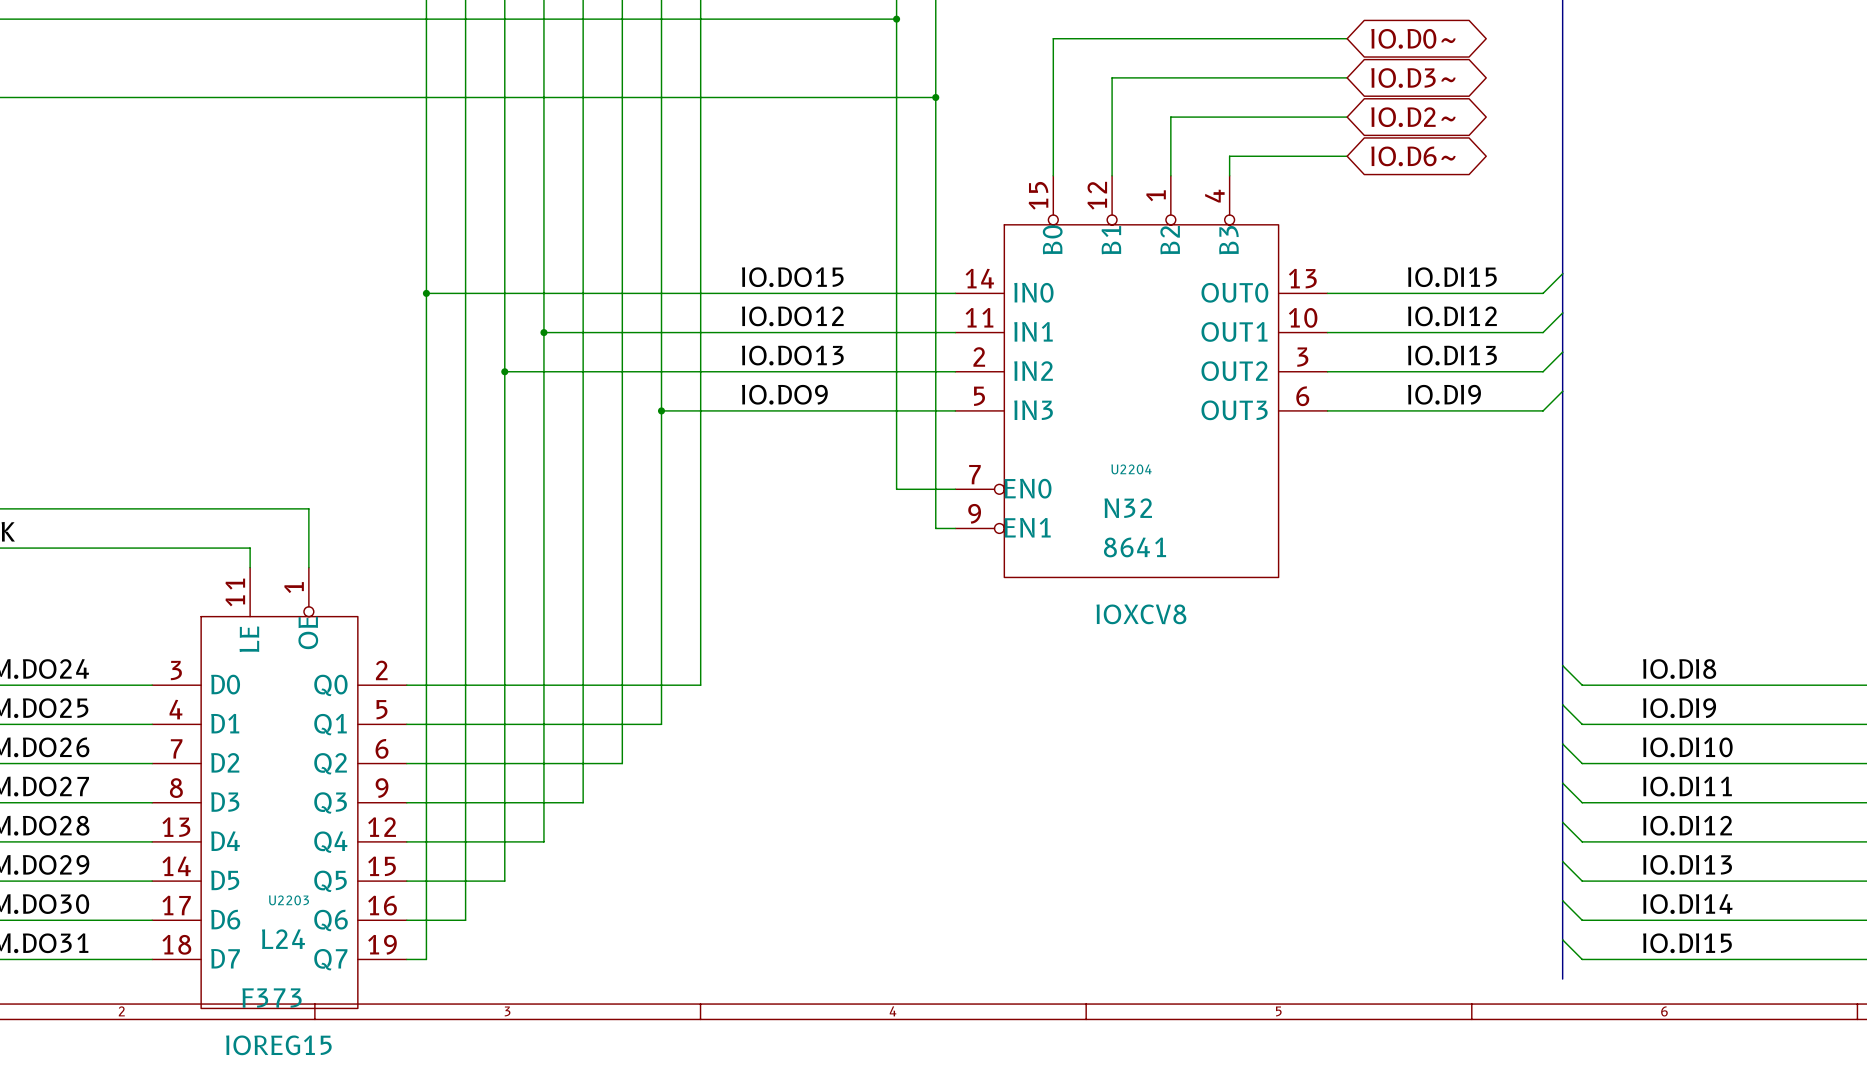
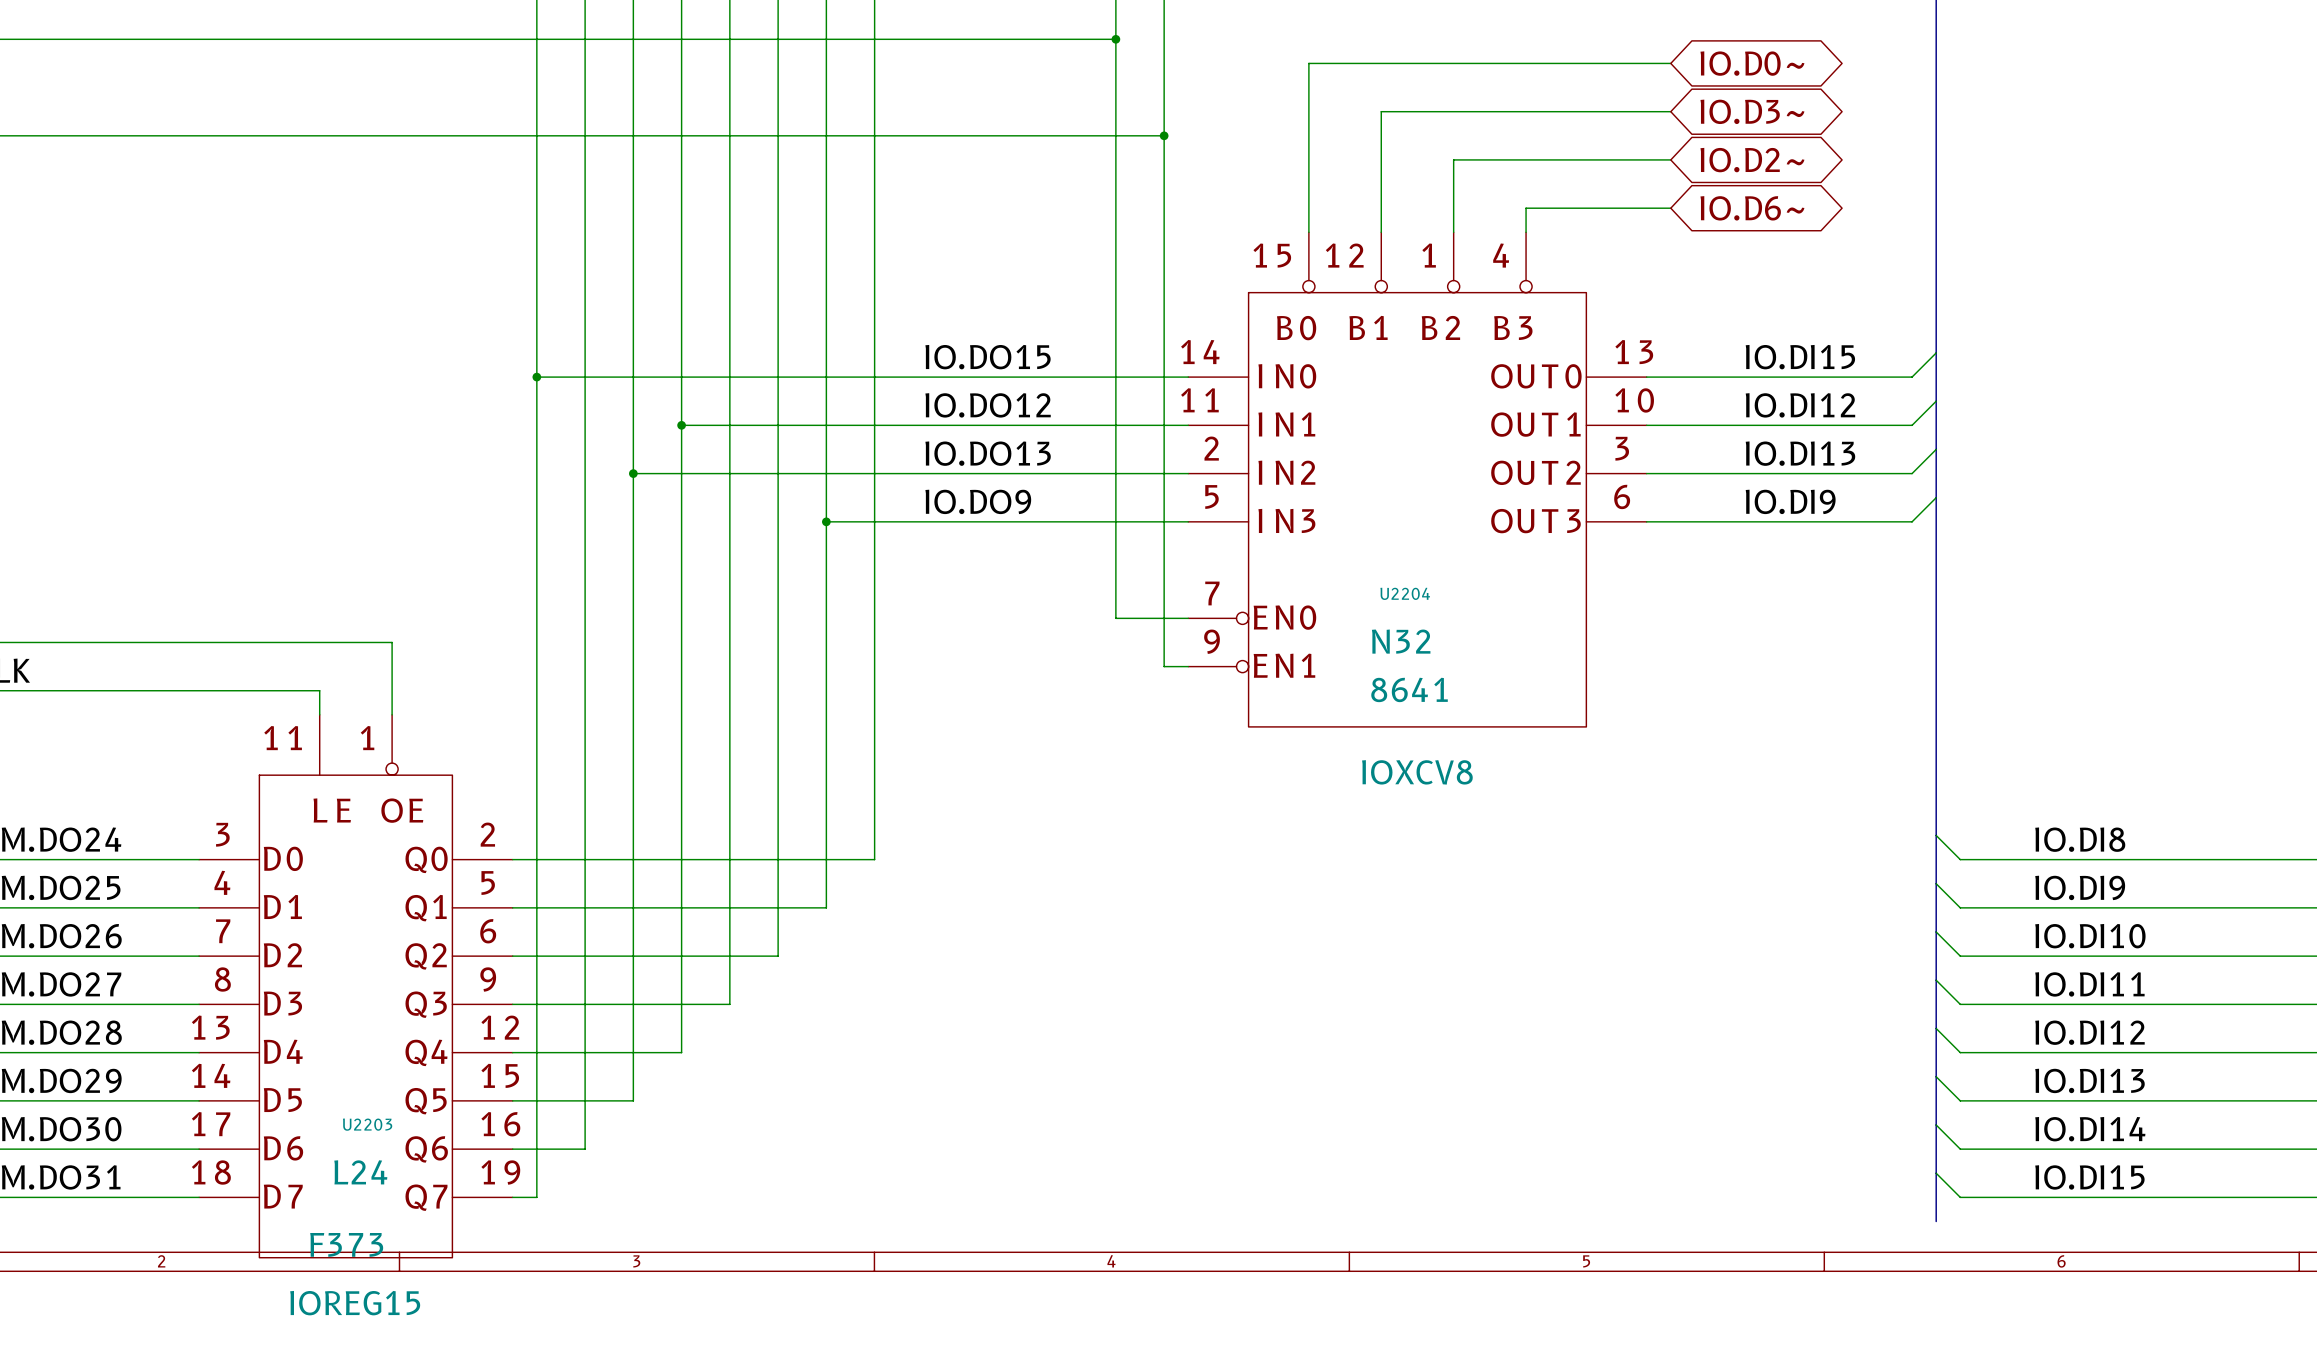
U2204 symbol: [955, 175, 1328, 578] -> [1188, 232, 1647, 727]
U2203 symbol: [152, 567, 407, 1009] -> [199, 714, 513, 1258]

